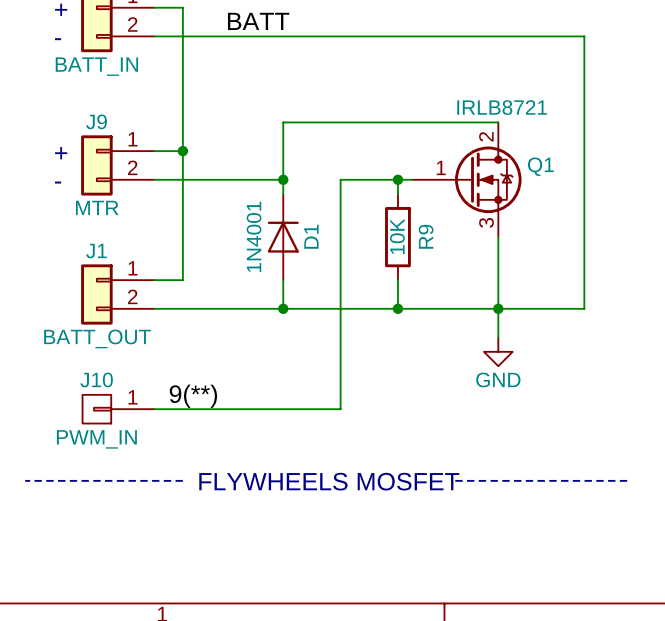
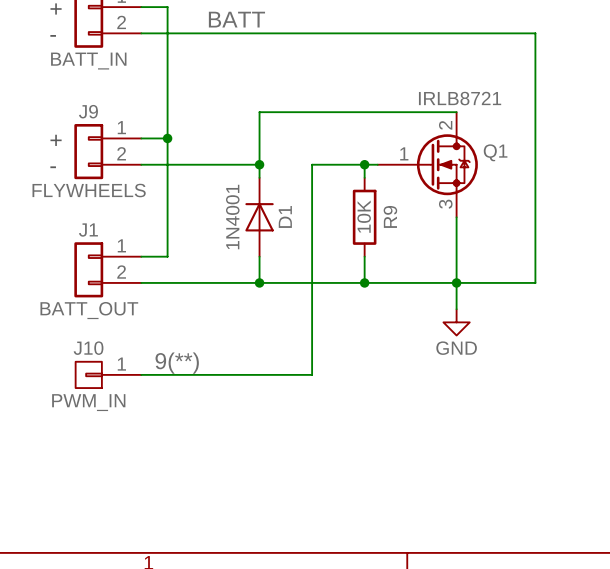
J9 value: MTR (97, 207) -> FLYWHEELS (89, 190)
line: (25, 480) (182, 480) -> none
line: (455, 480) (627, 480) -> none
text: FLYWHEELS MOSFET (329, 481) -> none

